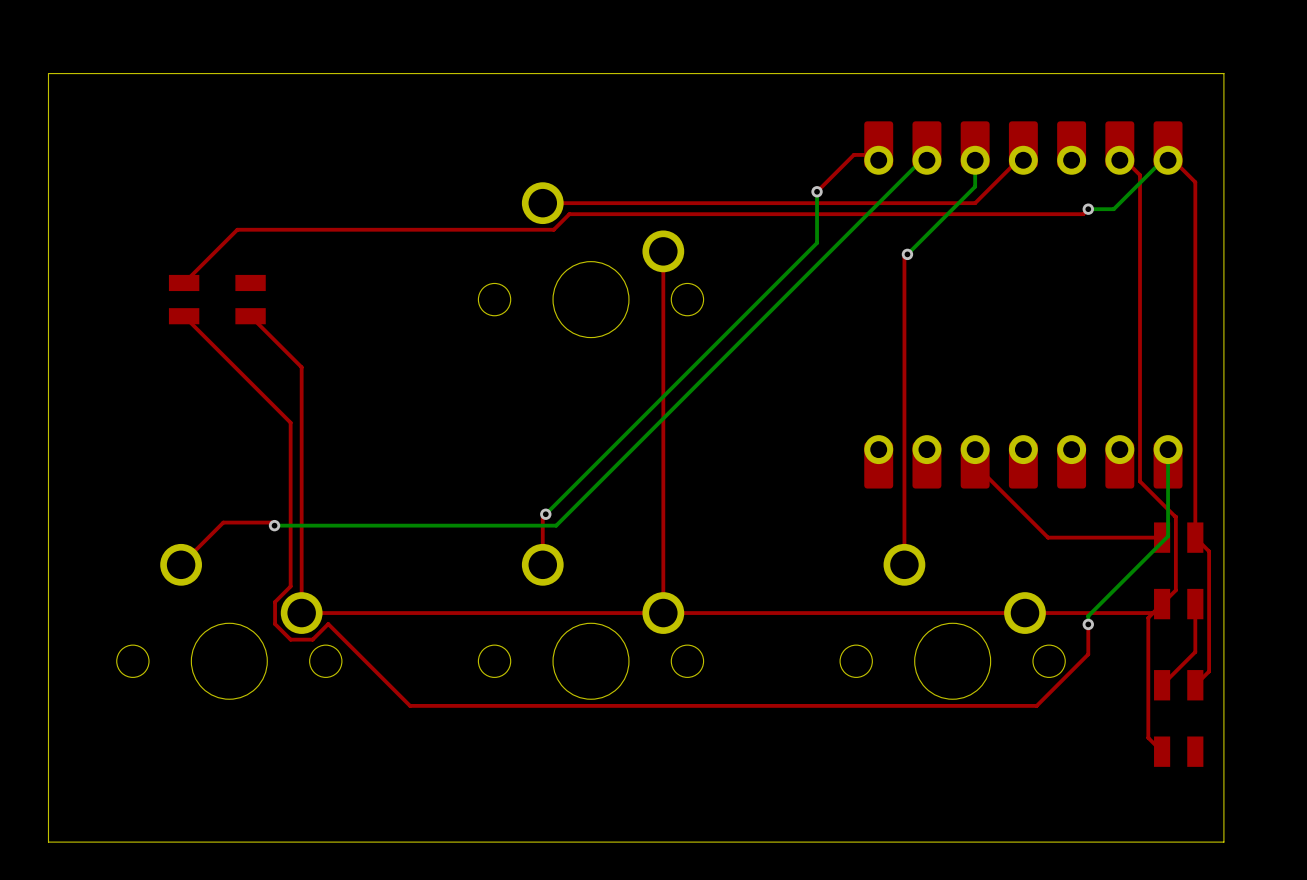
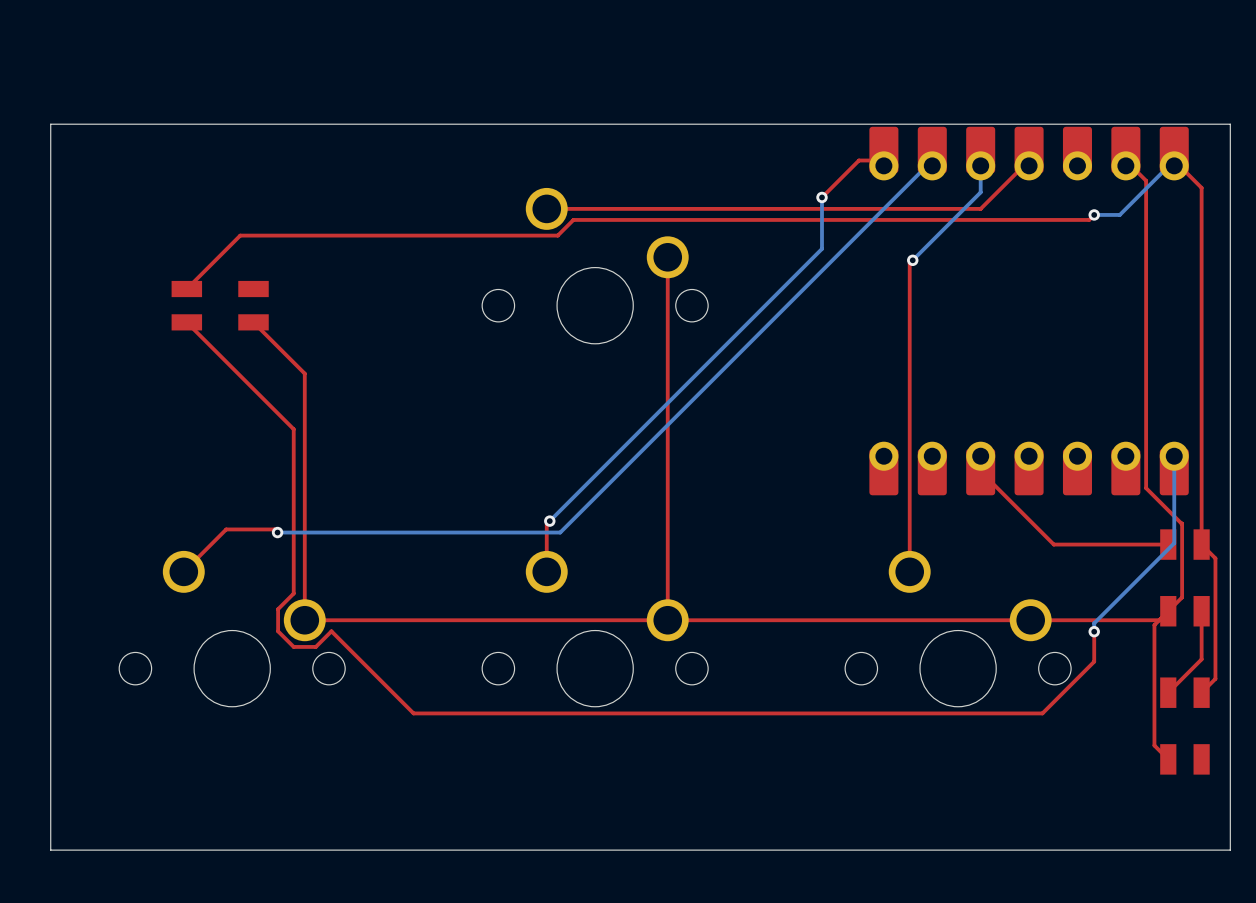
board edge: (1223, 118) (1223, 73) (48, 73) (48, 118) -> (1230, 124) (50, 124)

